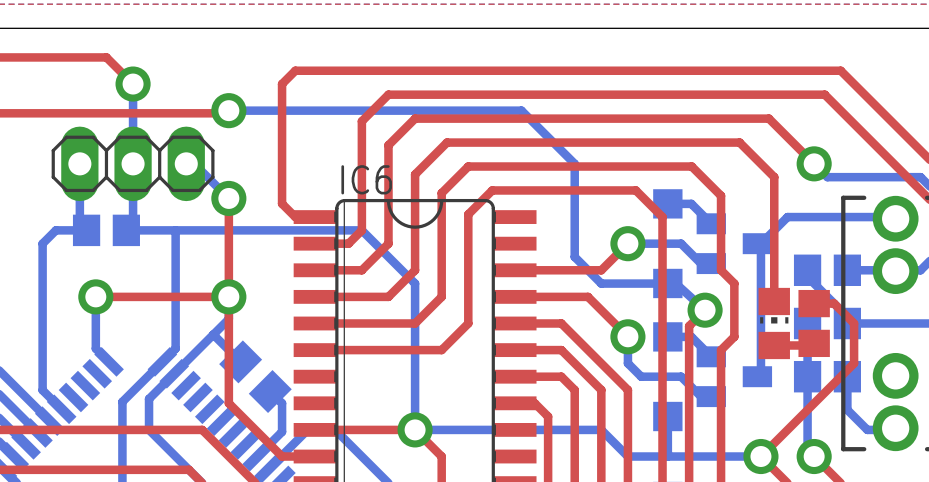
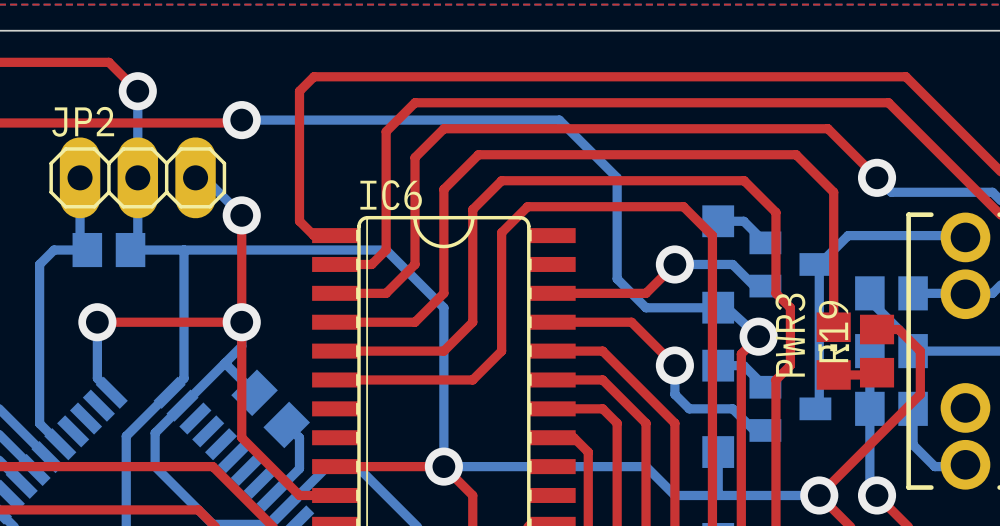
JP2 name: none -> JP2 (83, 121)
PWR3 name: none -> PWR3 (790, 335)
R19 name: none -> R19 (833, 331)

